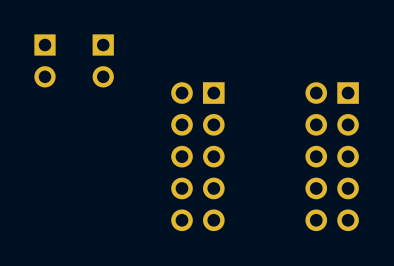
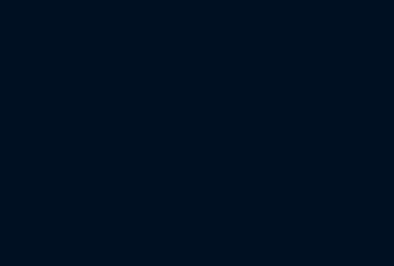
part: (45, 60) -> none
part: (103, 60) -> none
part: (197, 156) -> none
part: (332, 156) -> none

